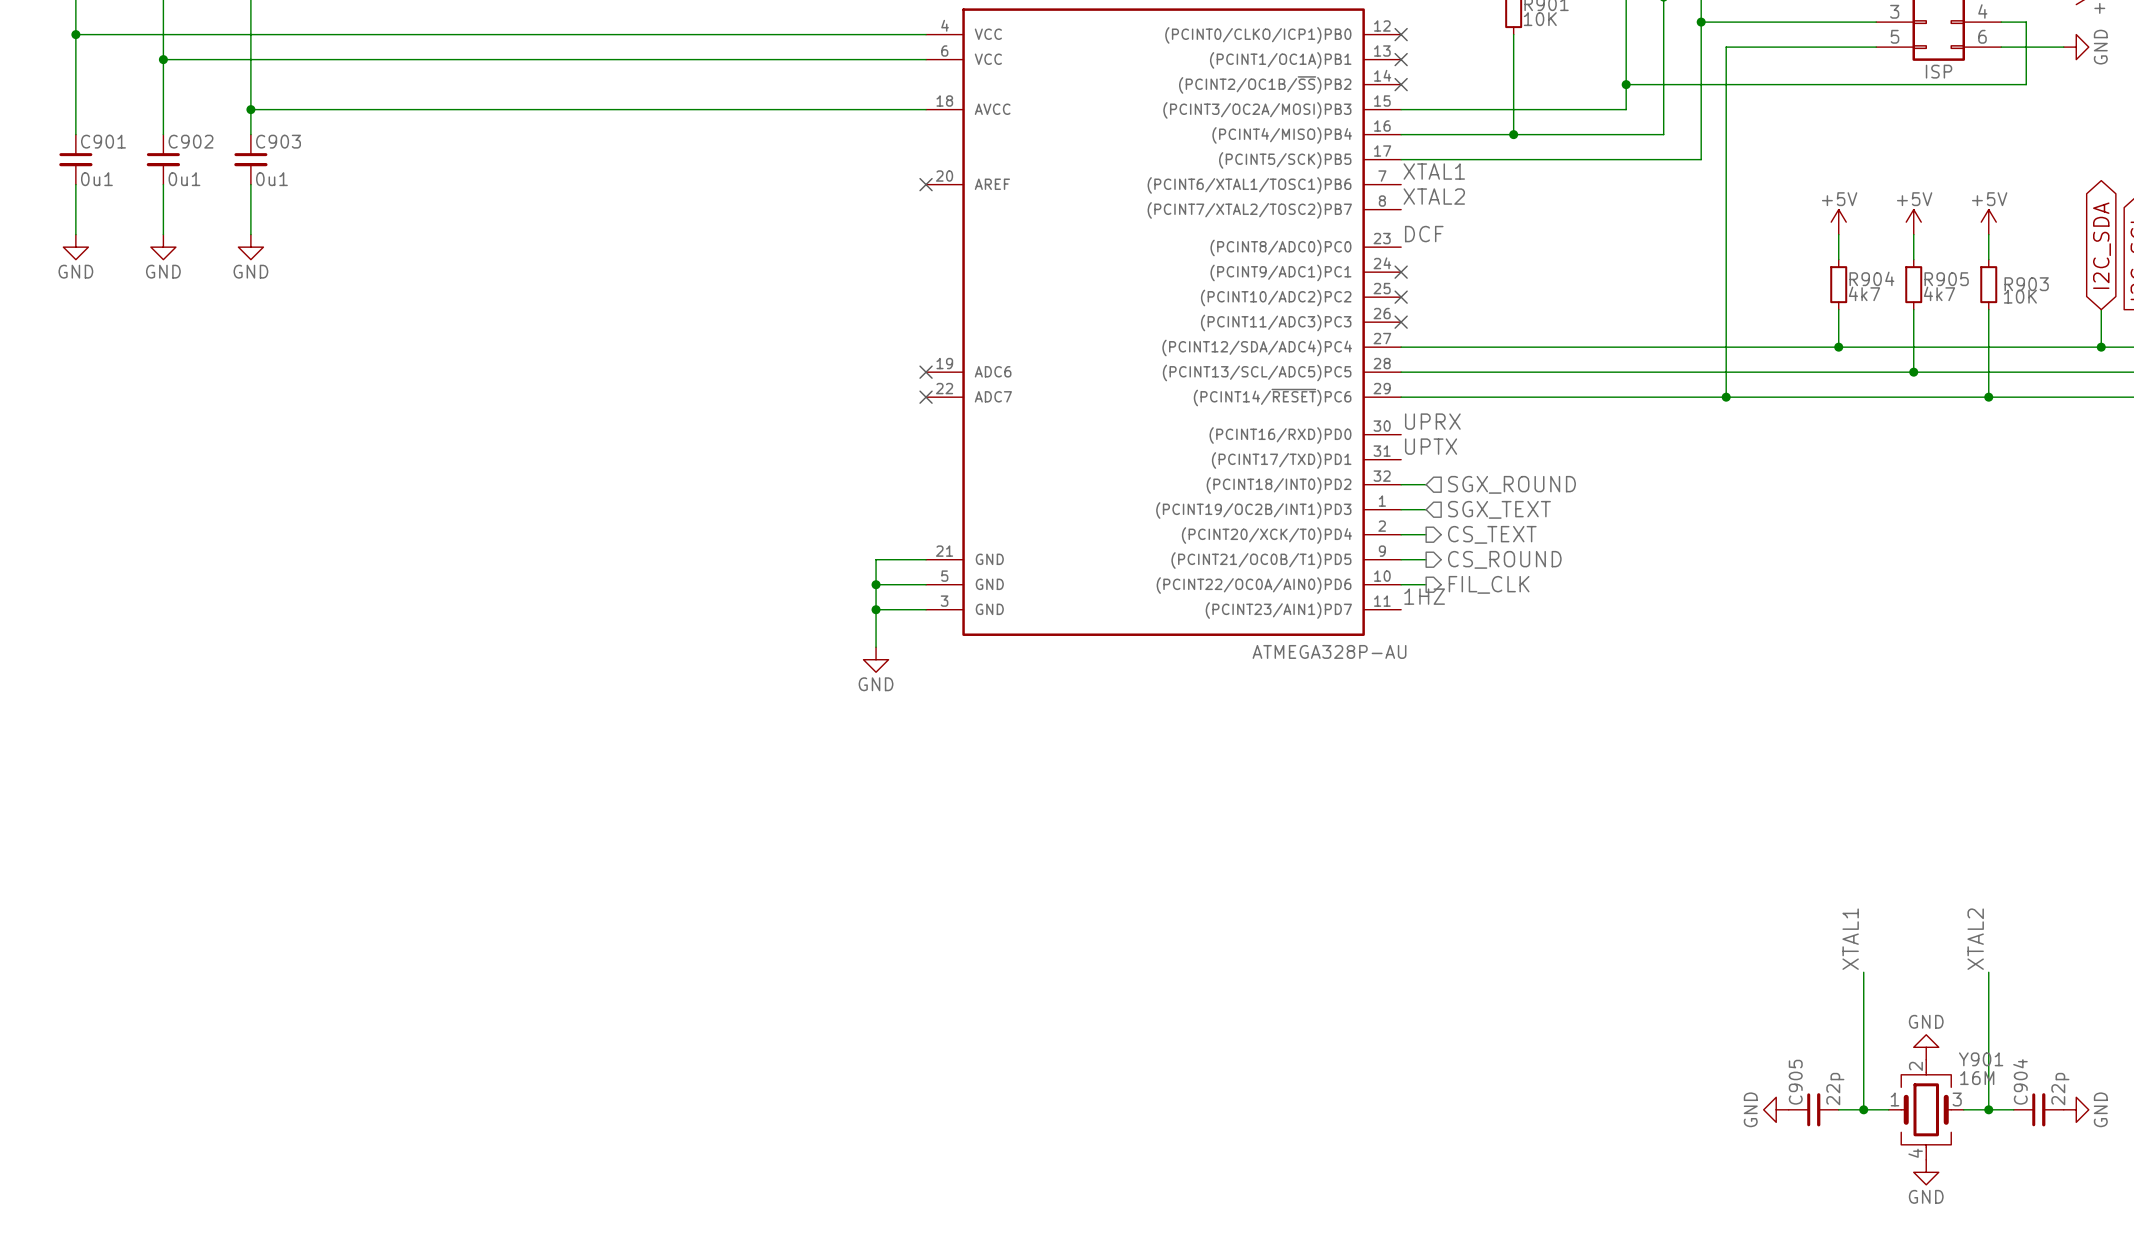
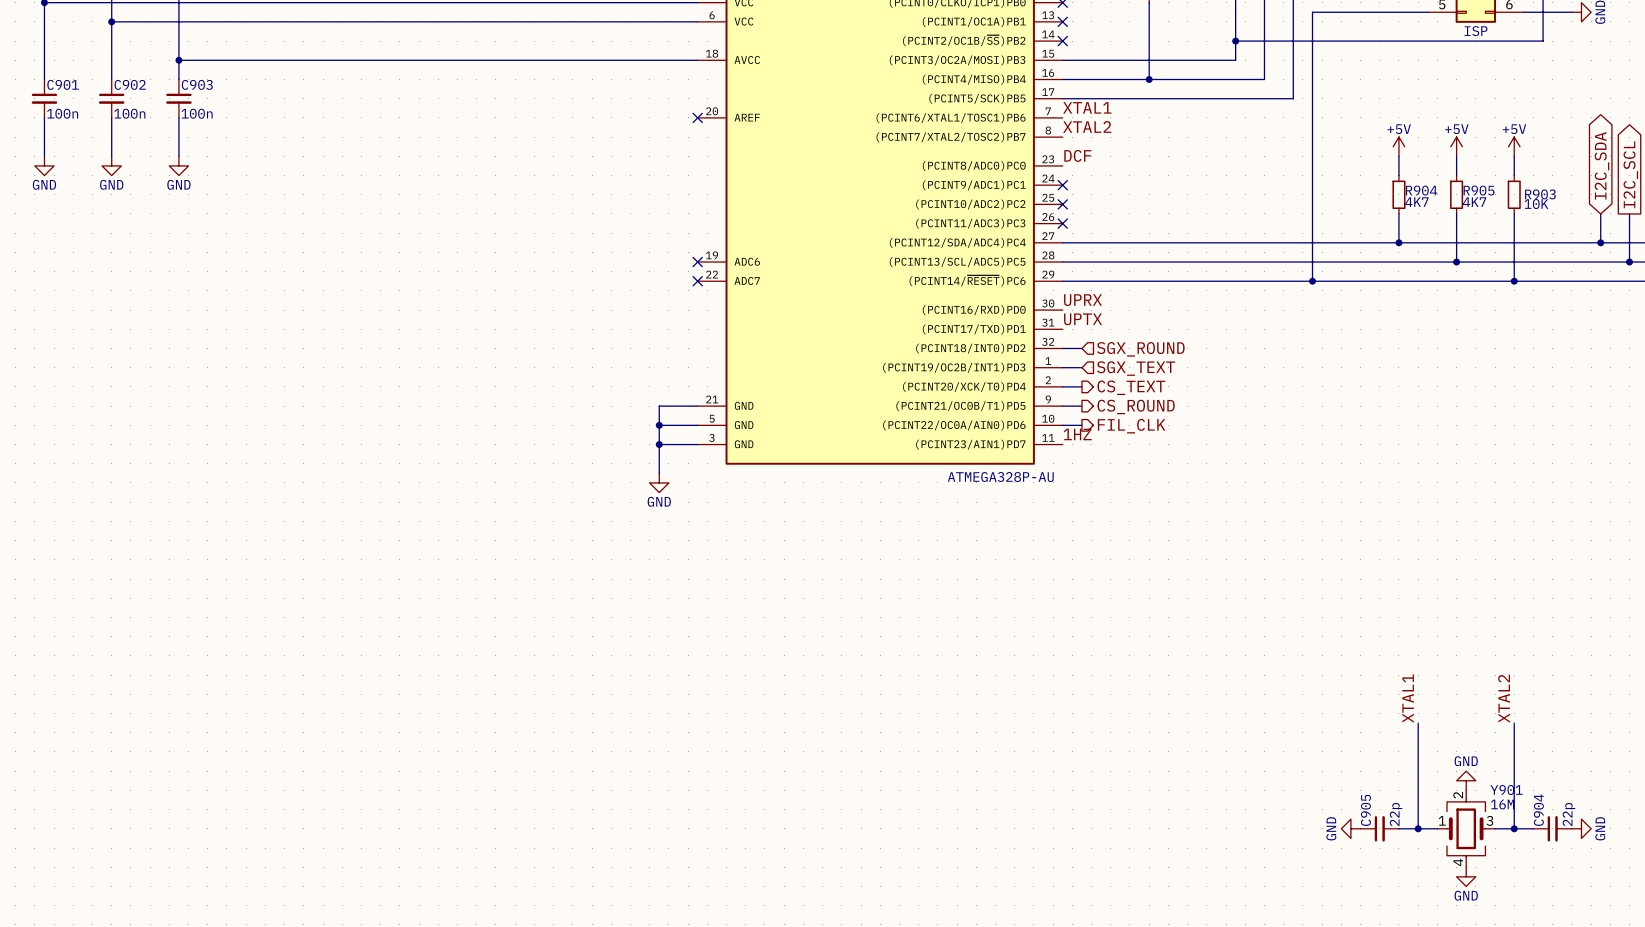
C901 value: 0u1 (96, 179) -> 100n (62, 113)
C902 value: 0u1 (184, 179) -> 100n (129, 113)
C903 value: 0u1 (271, 179) -> 100n (197, 113)
R904 value: 4k7 (1864, 293) -> 4K7 (1416, 202)
R905 value: 4k7 (1939, 293) -> 4K7 (1474, 202)

